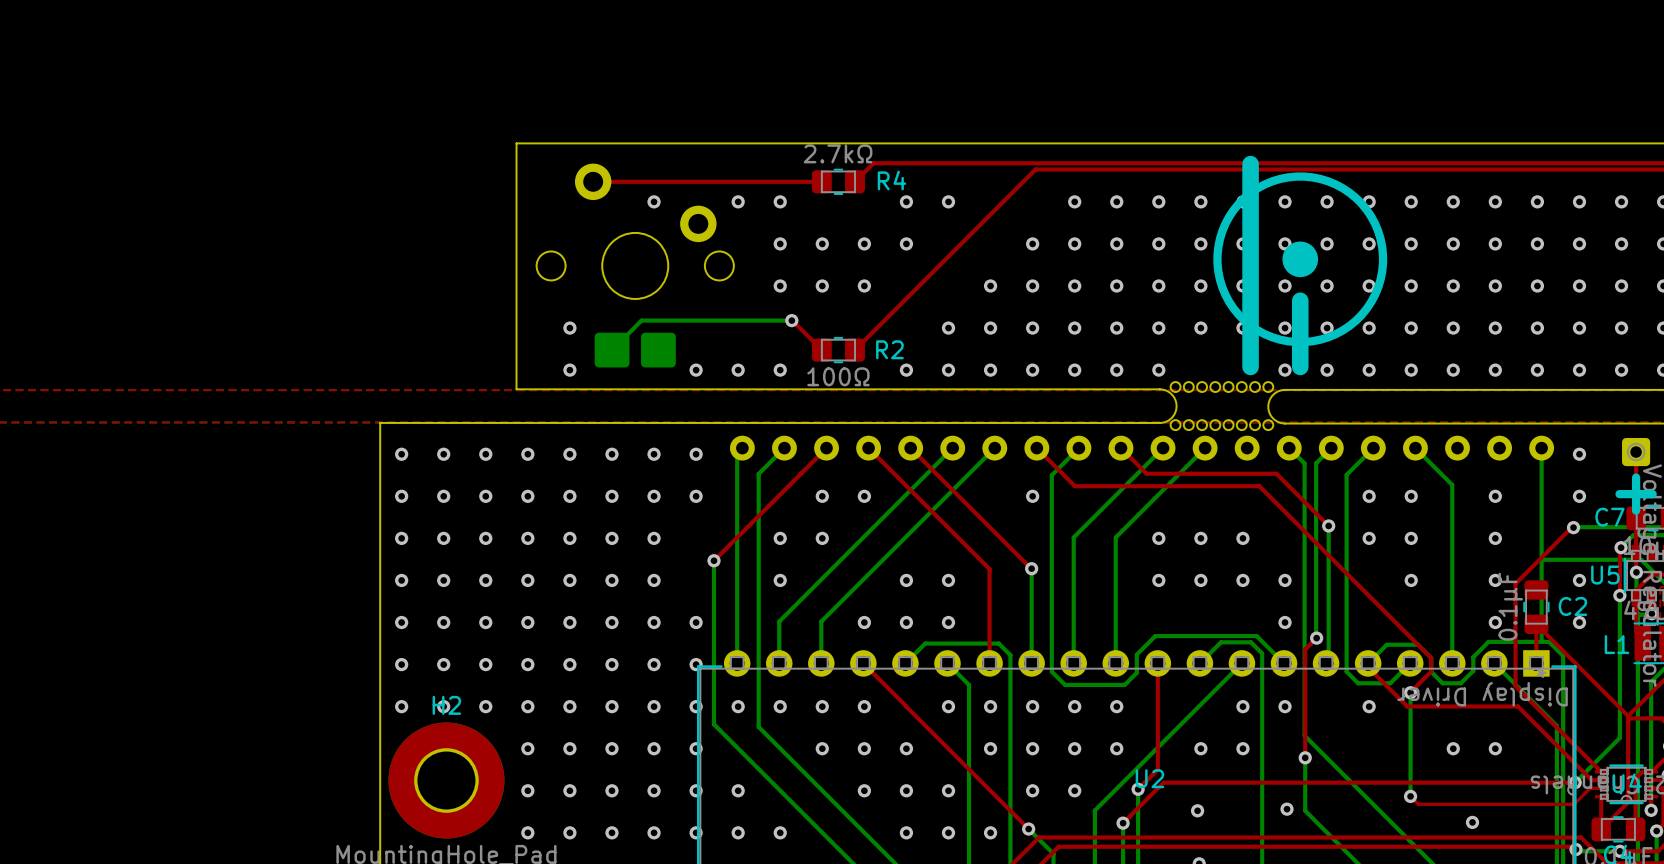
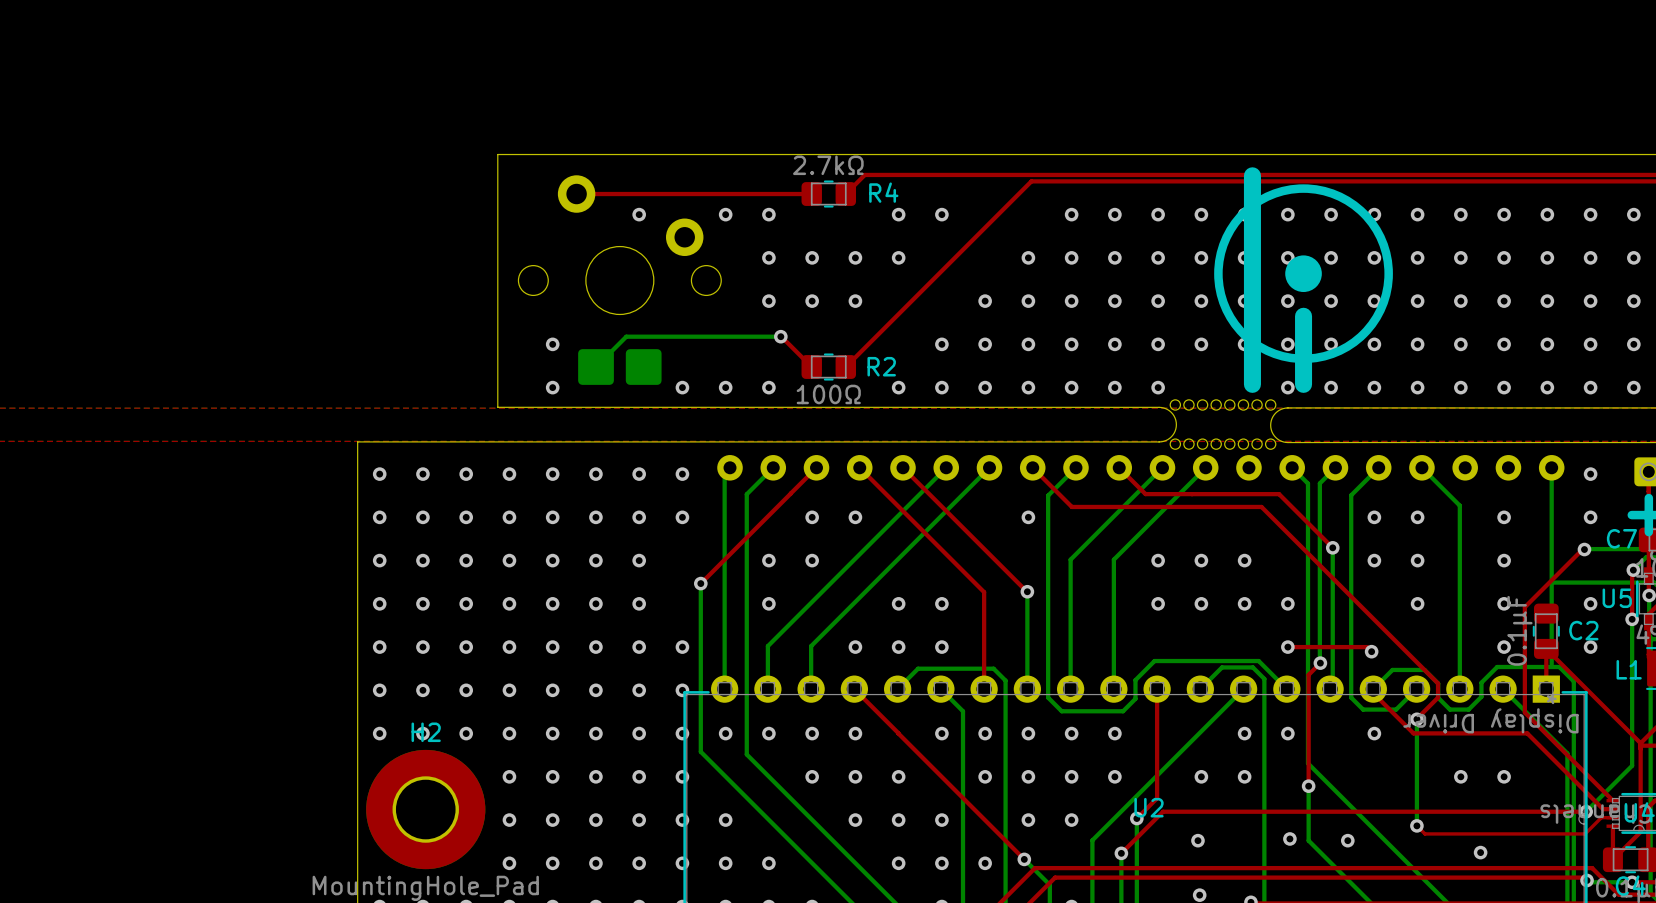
top track: none -> (1287, 647) (1367, 647) (1371, 651)
via: none -> (1371, 651)
via: none -> (1347, 840)

